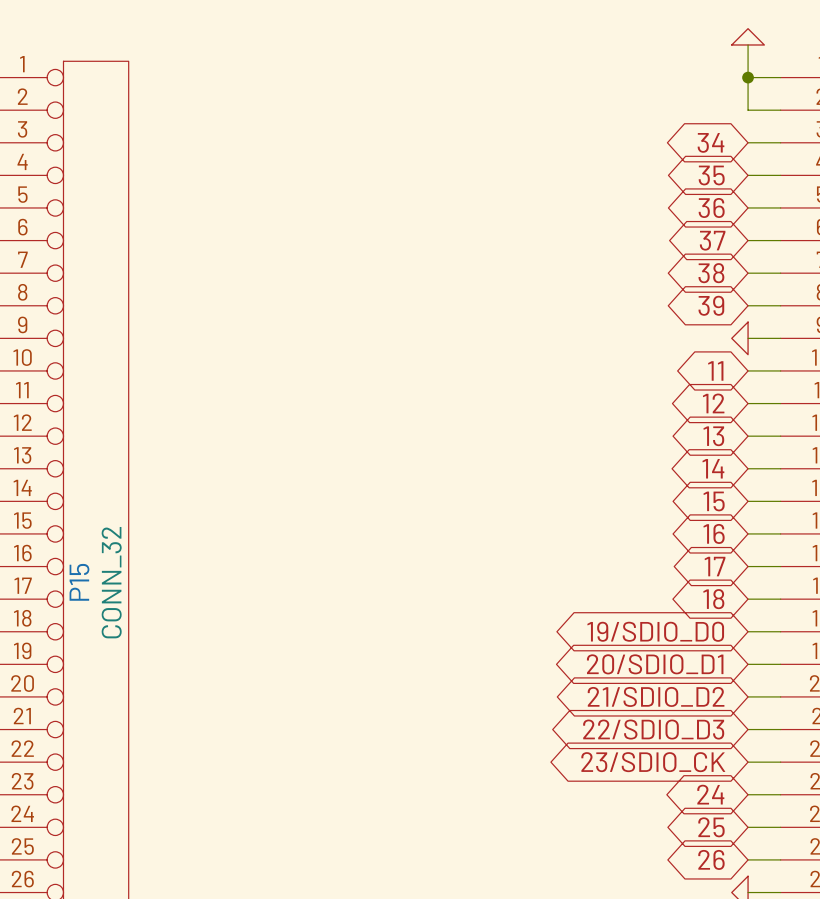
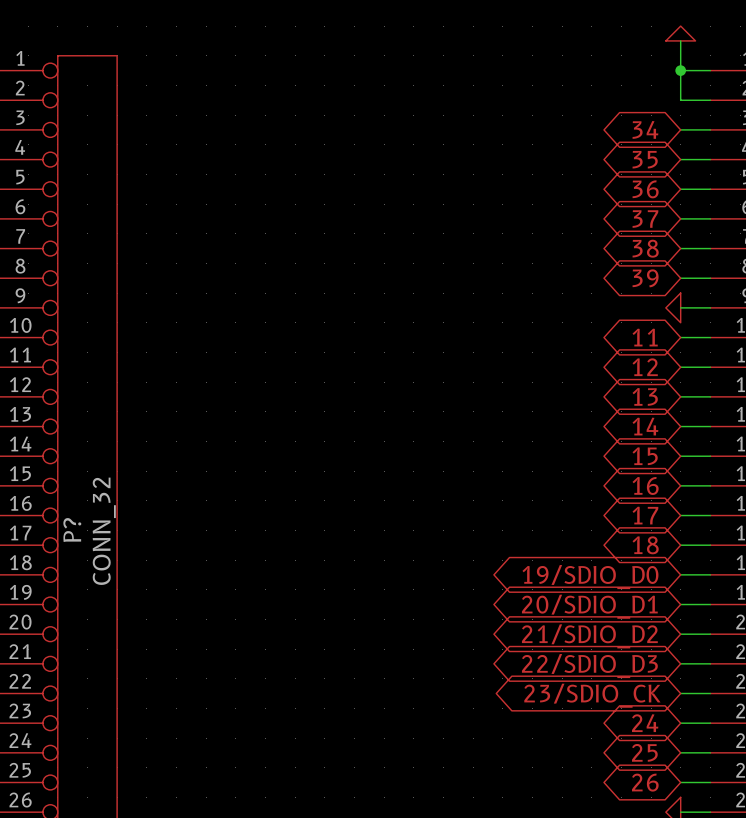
P15 name: P15 (79, 582) -> P? (72, 530)

